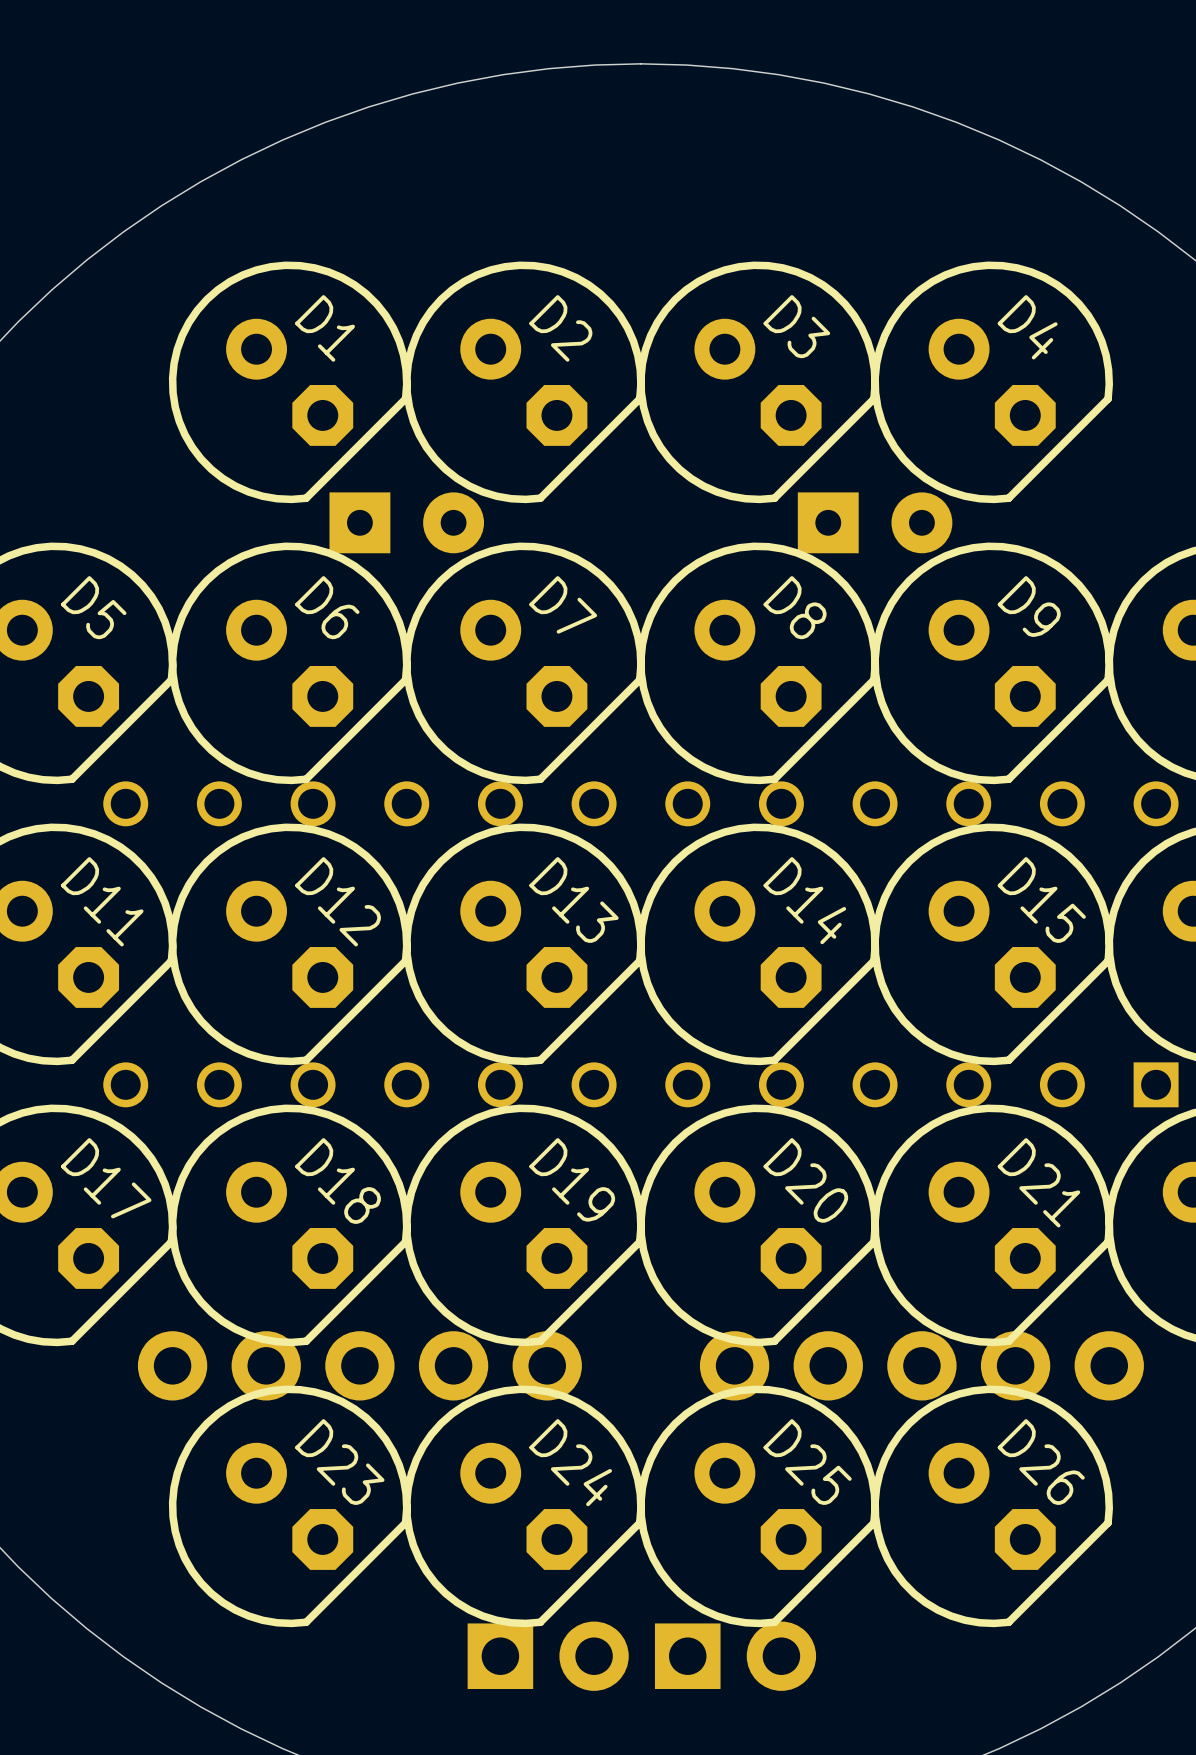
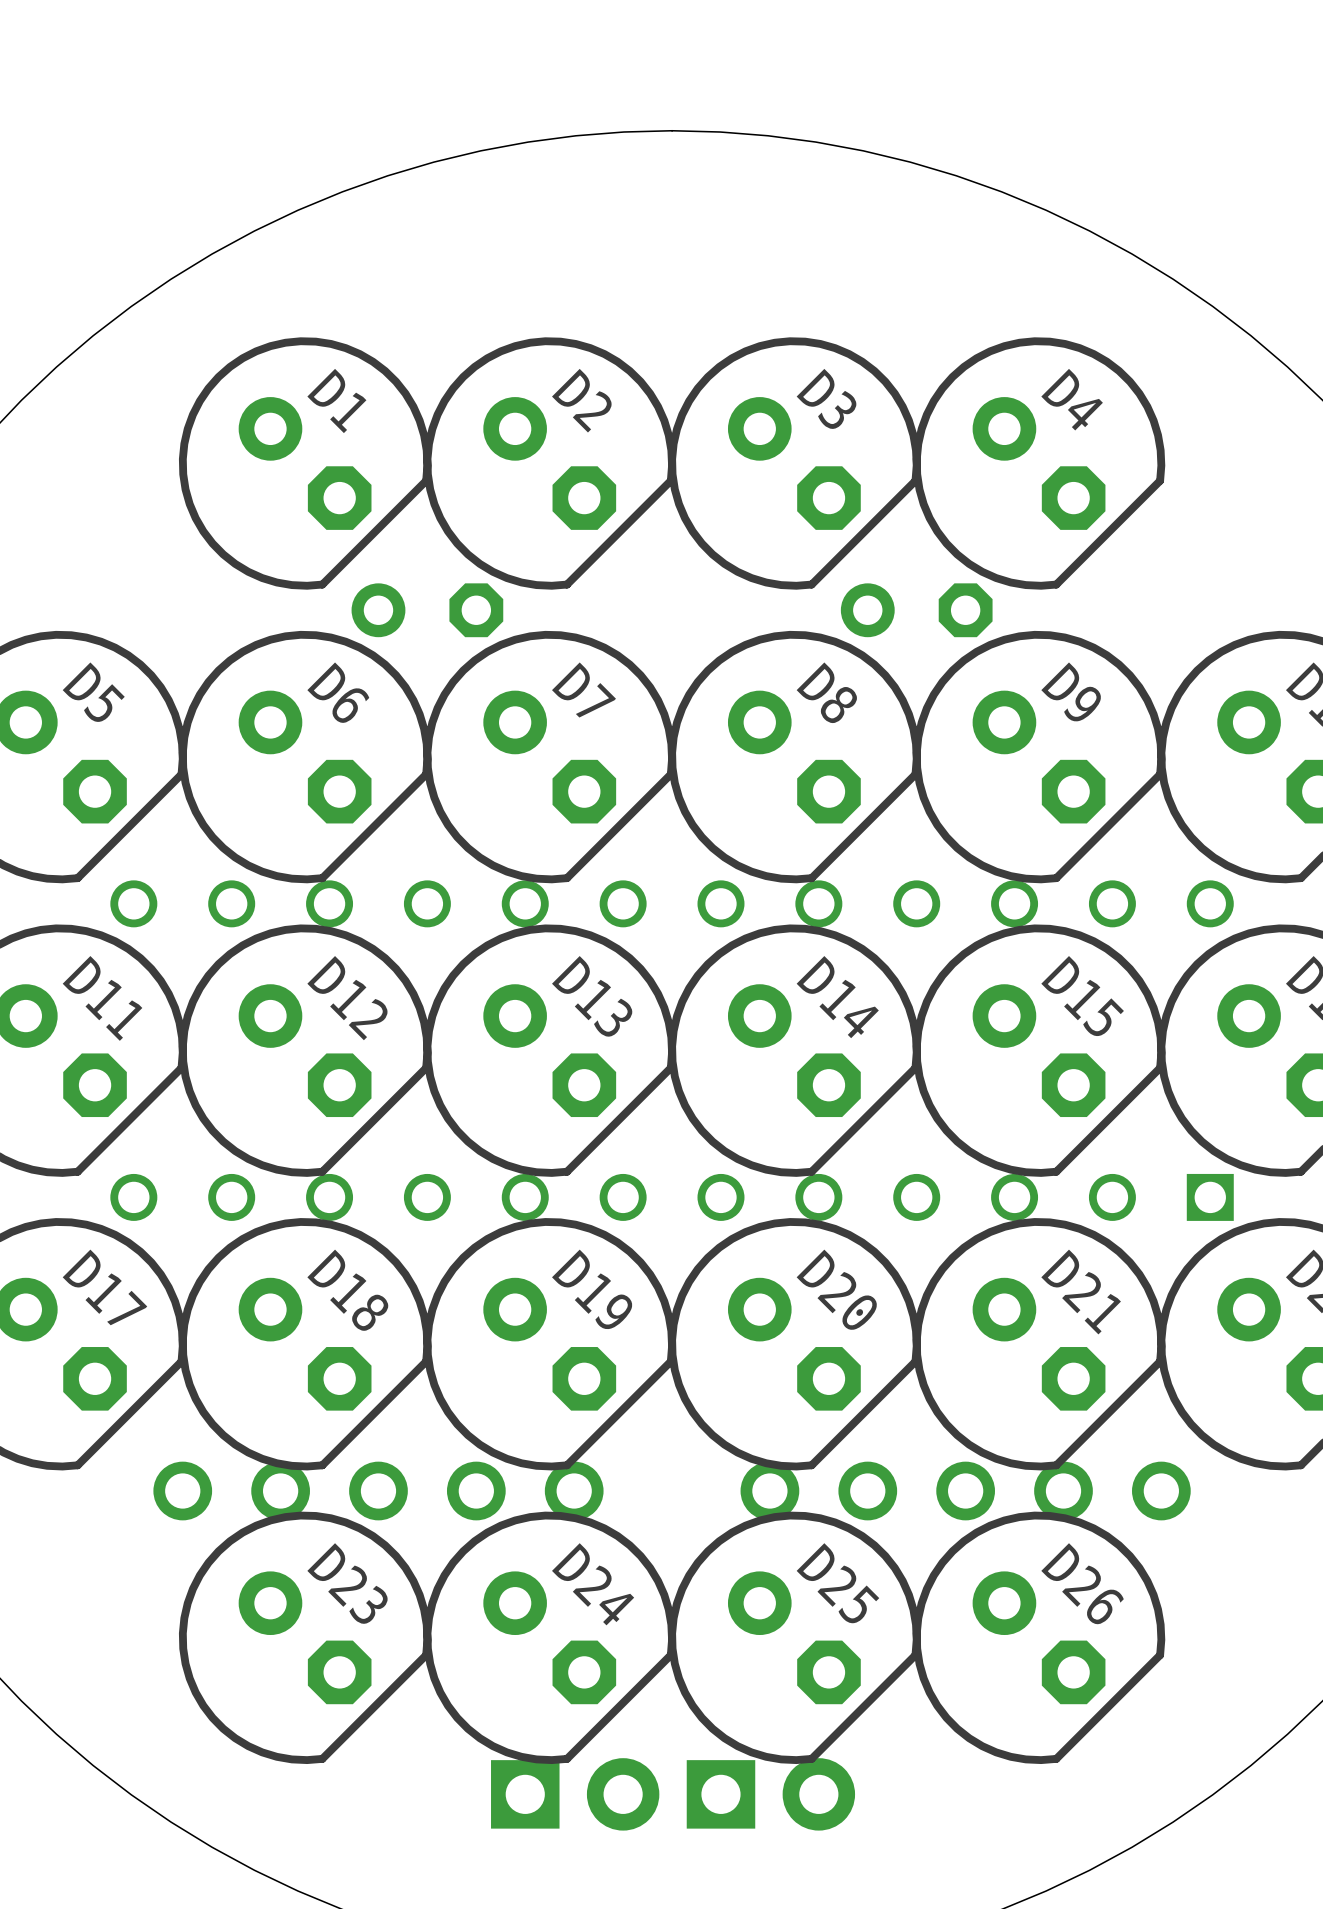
part footprint: [329, 492, 485, 554] -> [351, 583, 504, 638]
part footprint: [797, 492, 953, 554] -> [840, 583, 993, 638]
part footprint: [137, 1331, 582, 1401] -> [153, 1461, 604, 1521]
part footprint: [699, 1331, 1144, 1401] -> [740, 1461, 1191, 1521]

